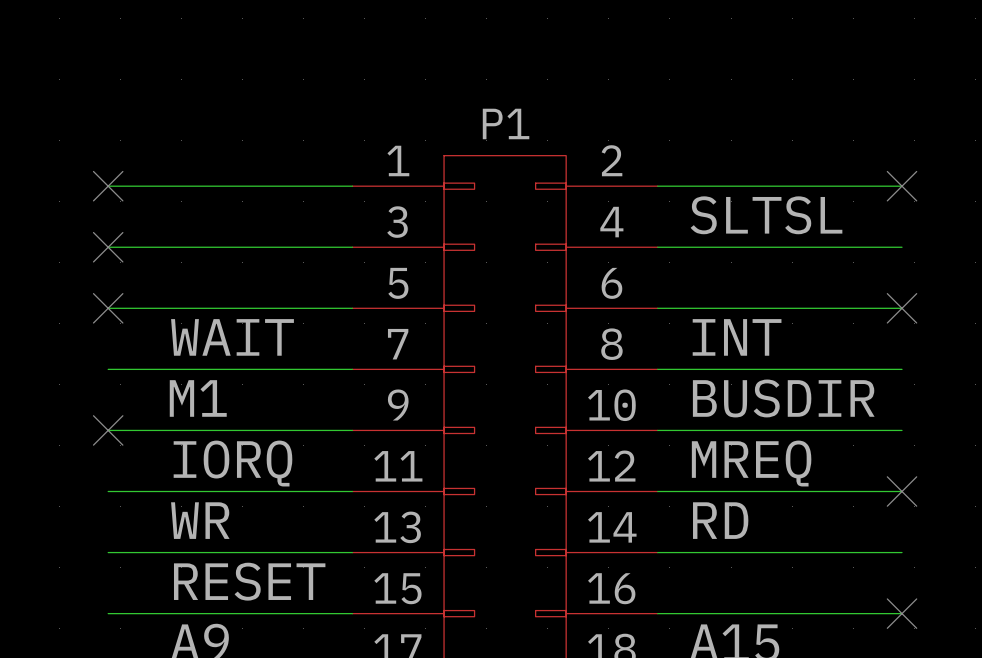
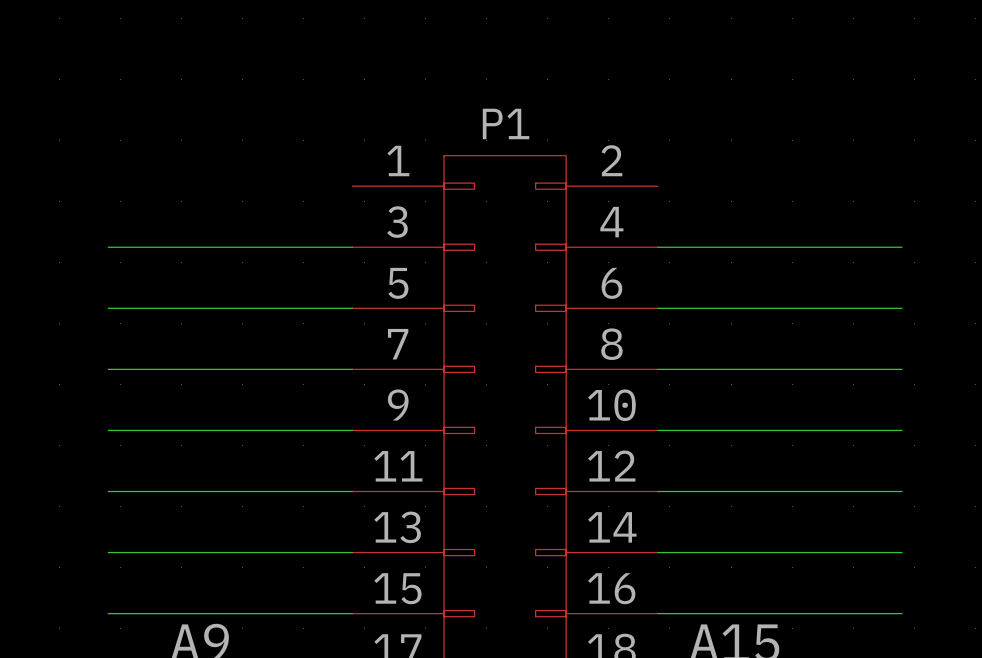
wire: (108, 186) (352, 186) -> none
no-connect mark: (108, 186) -> none
wire: (657, 186) (902, 186) -> none
no-connect mark: (902, 186) -> none
label: SLTSL (766, 215) -> none
no-connect mark: (108, 247) -> none
no-connect mark: (108, 308) -> none
no-connect mark: (902, 308) -> none
label: WAIT (232, 337) -> none
label: INT (737, 337) -> none
label: M1 (198, 398) -> none
label: BUSDIR (783, 398) -> none
no-connect mark: (108, 430) -> none
label: IORQ (232, 463) -> none
label: MREQ (751, 463) -> none
no-connect mark: (902, 491) -> none
label: WR (200, 520) -> none
label: RD (720, 520) -> none
label: RESET (249, 581) -> none
no-connect mark: (902, 613) -> none

